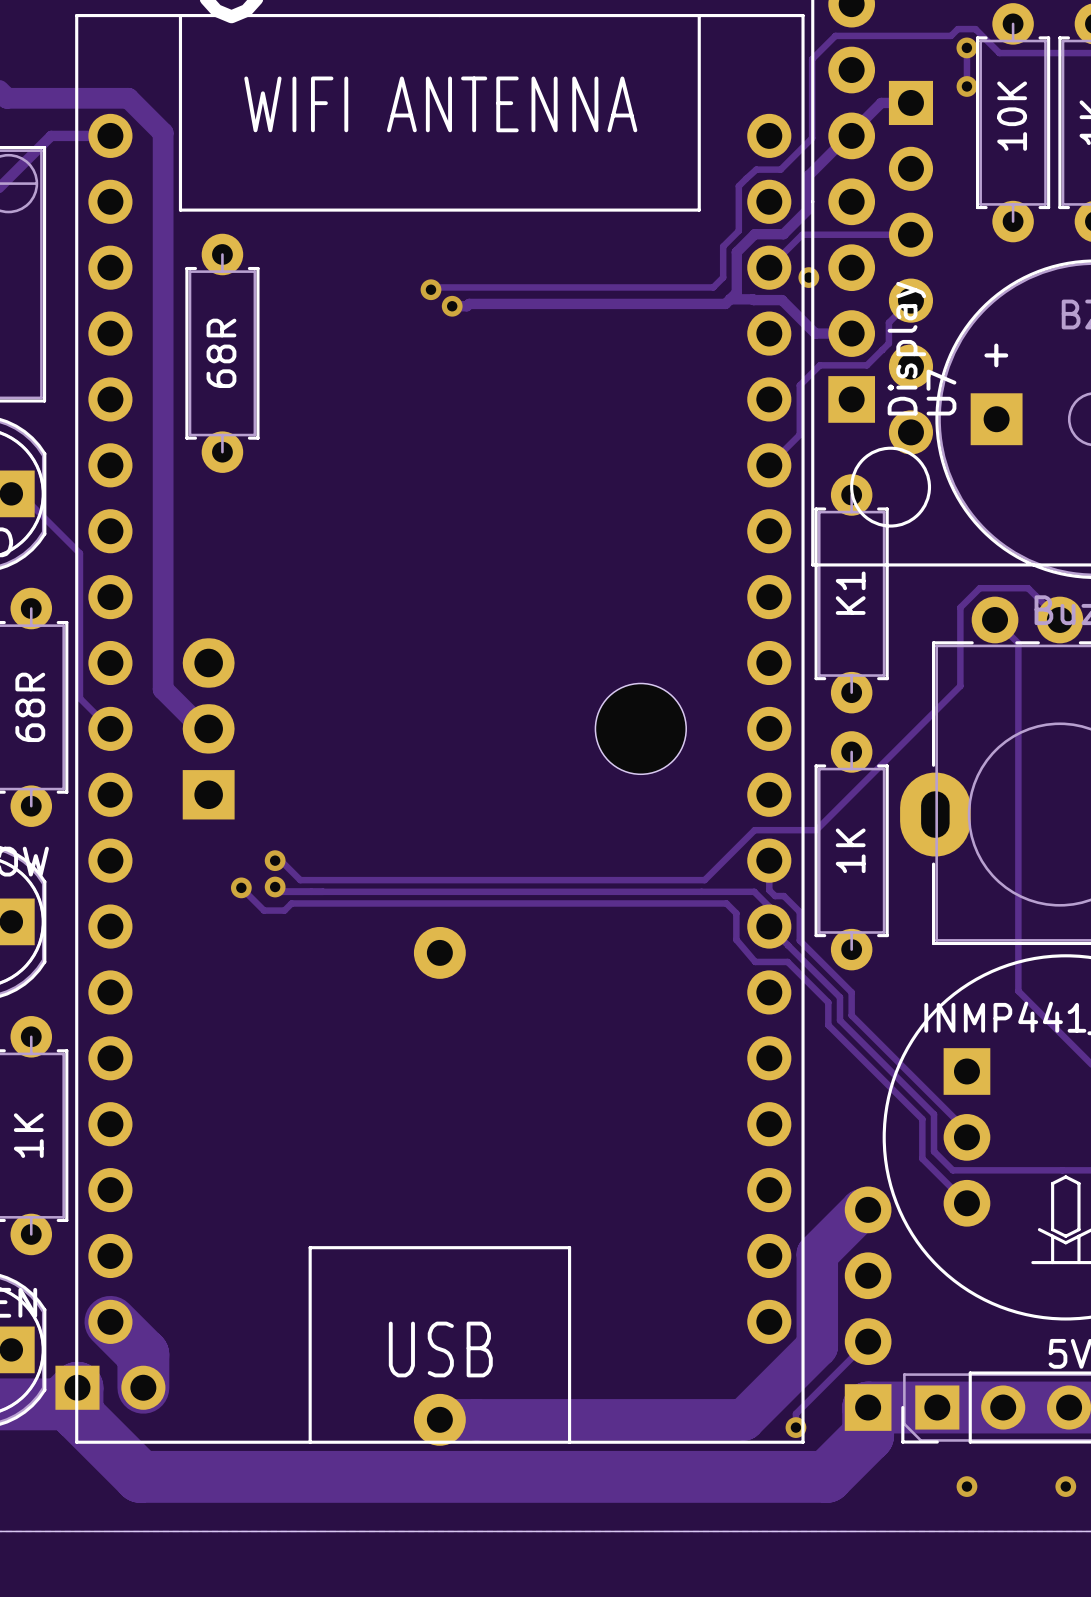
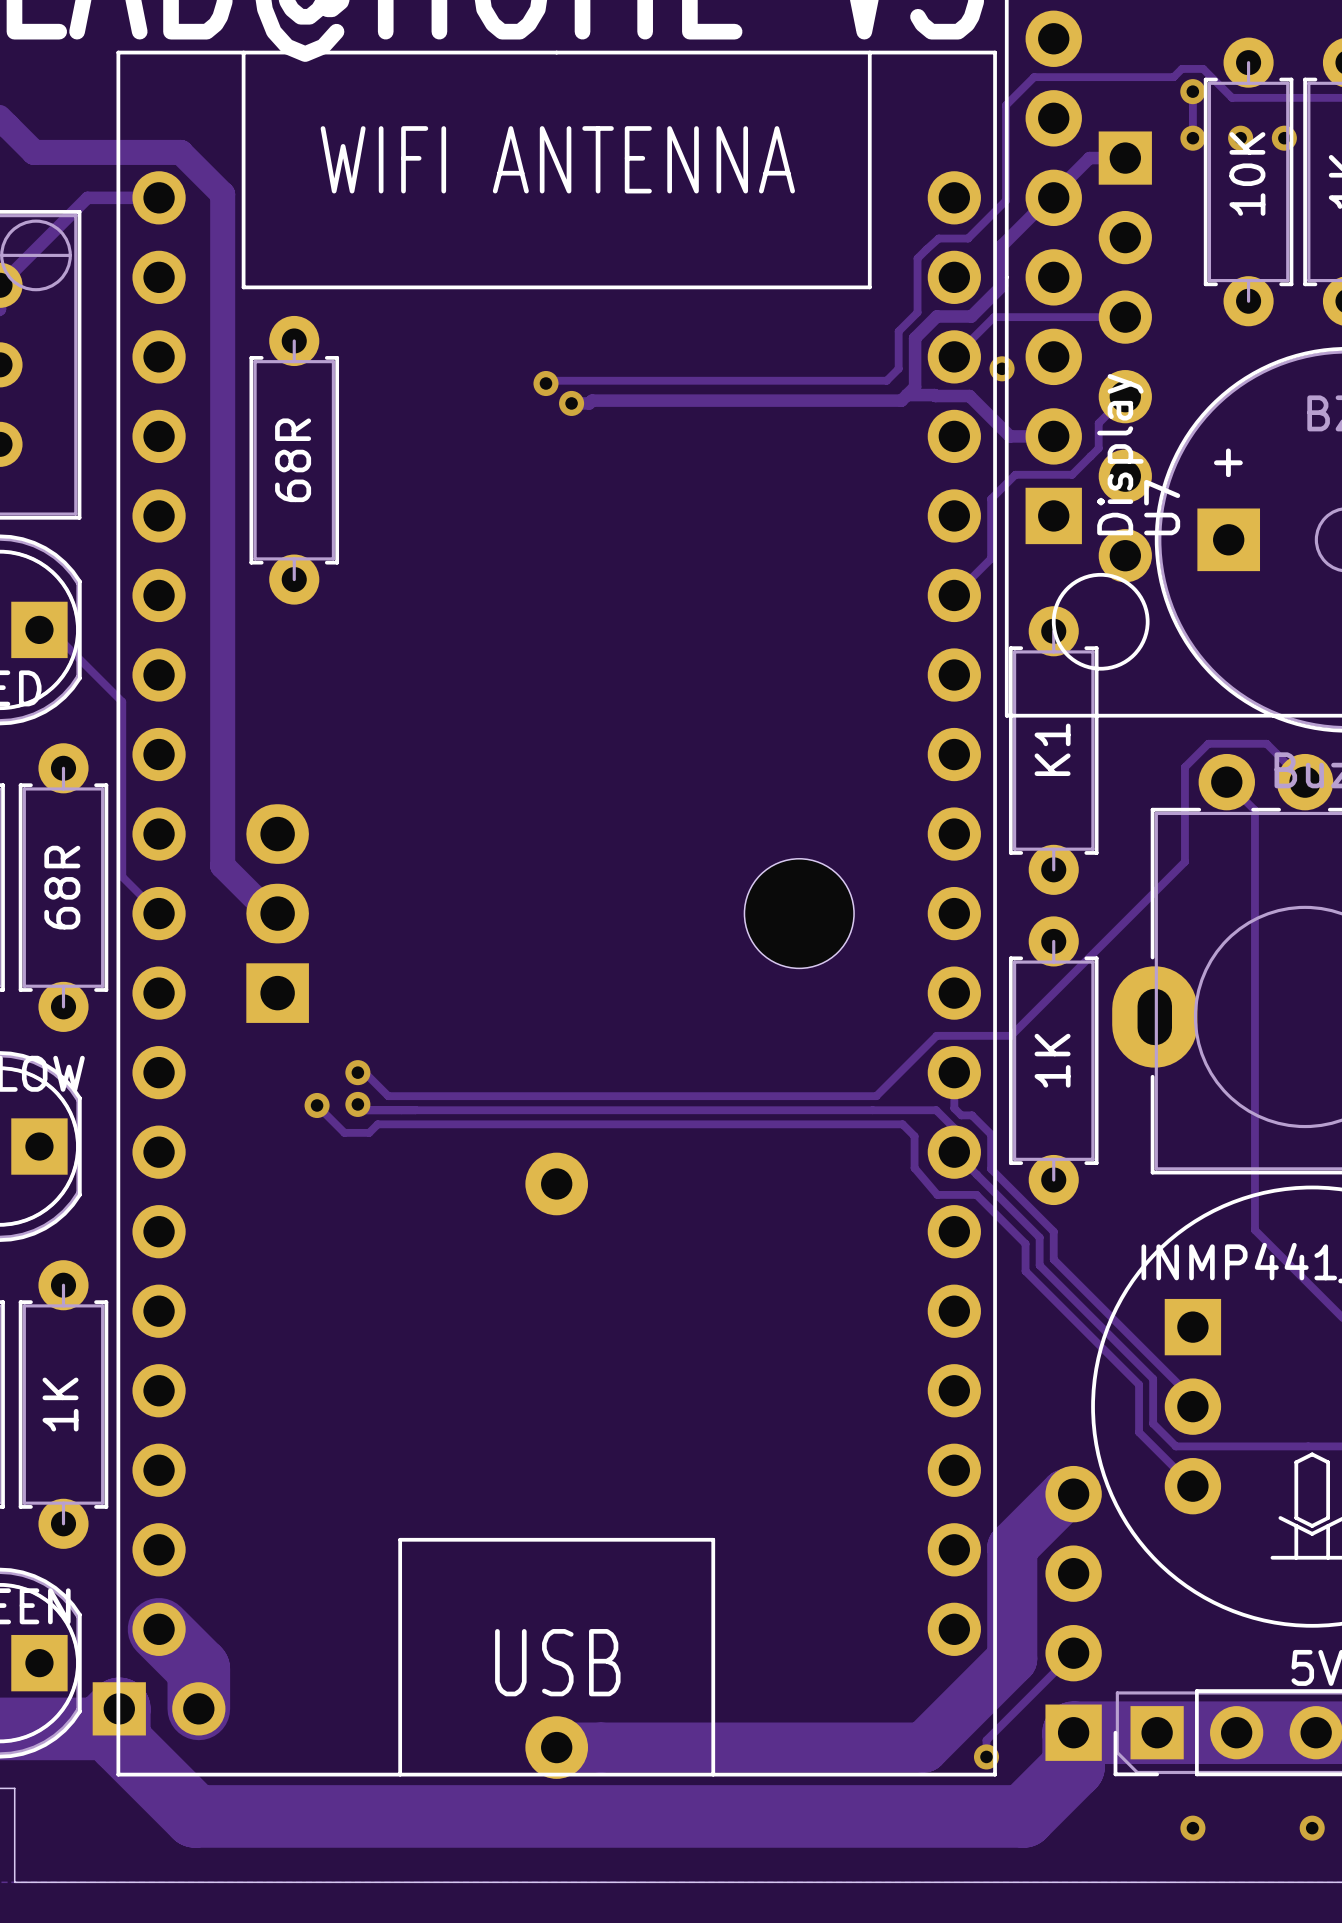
via: none -> (1240, 138)
via: none -> (1284, 138)

